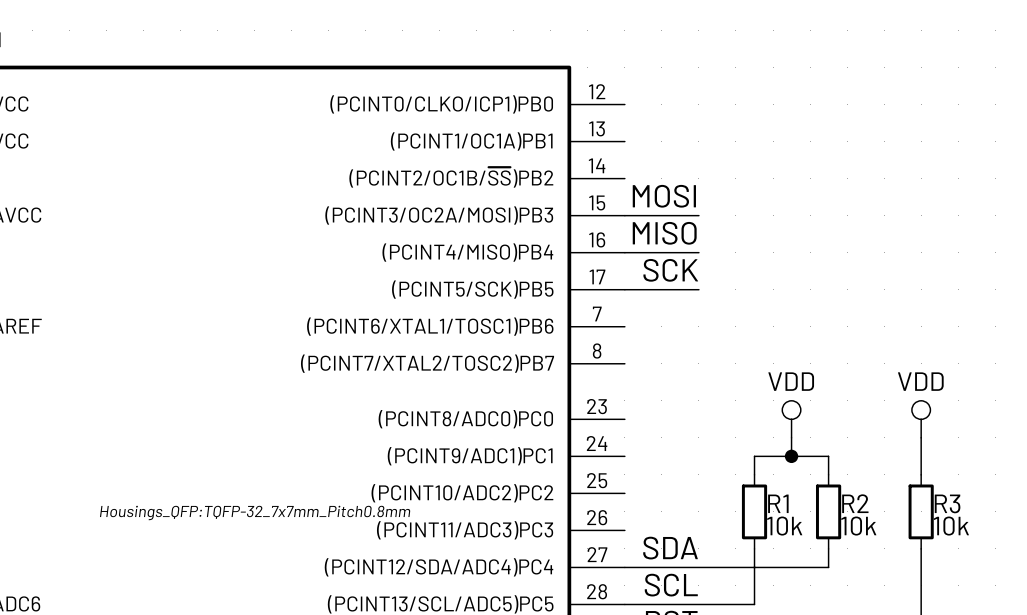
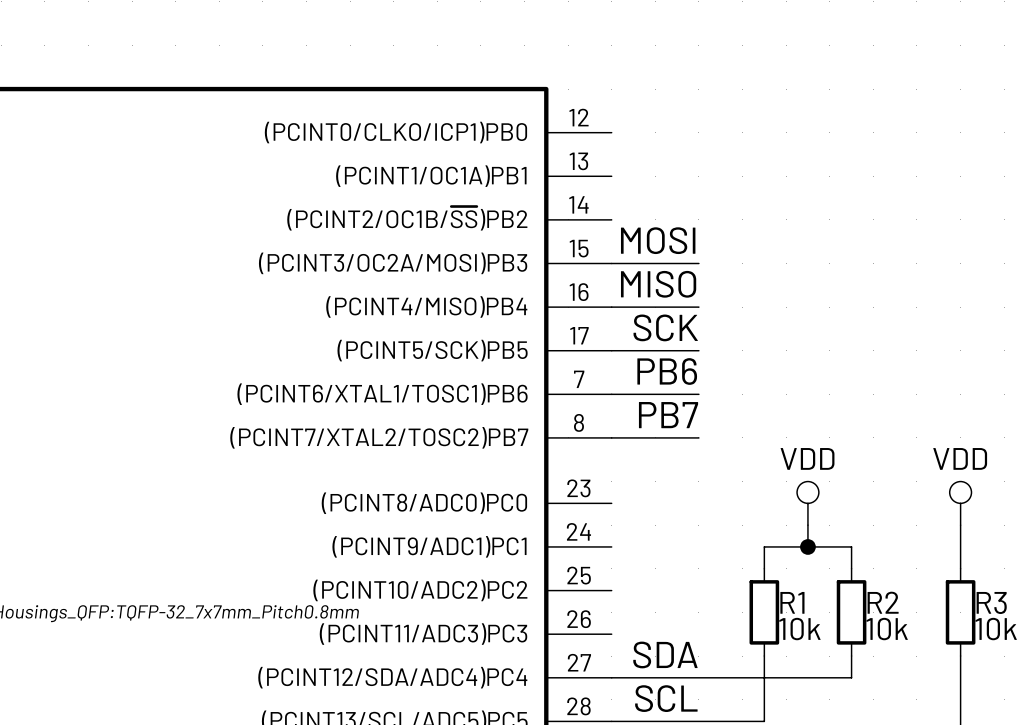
label: none -> PB6 (667, 371)
wire: none -> (611, 394) (698, 394)
label: none -> PB7 (668, 415)
wire: none -> (611, 437) (698, 437)

